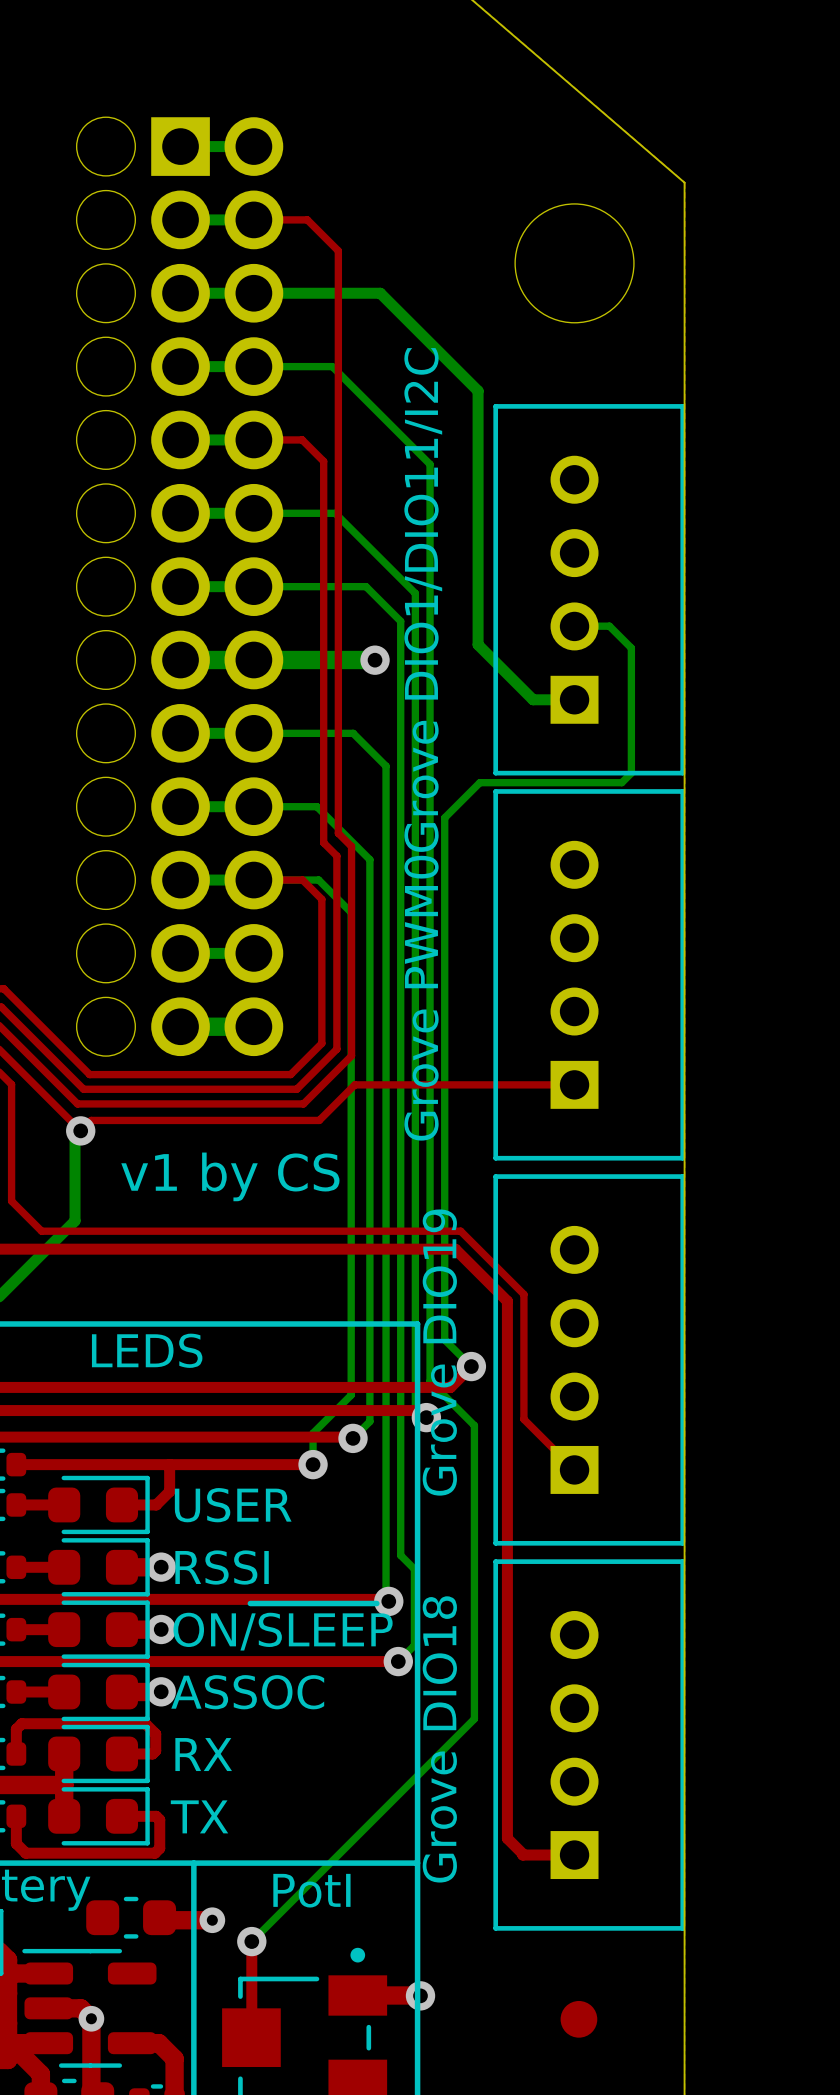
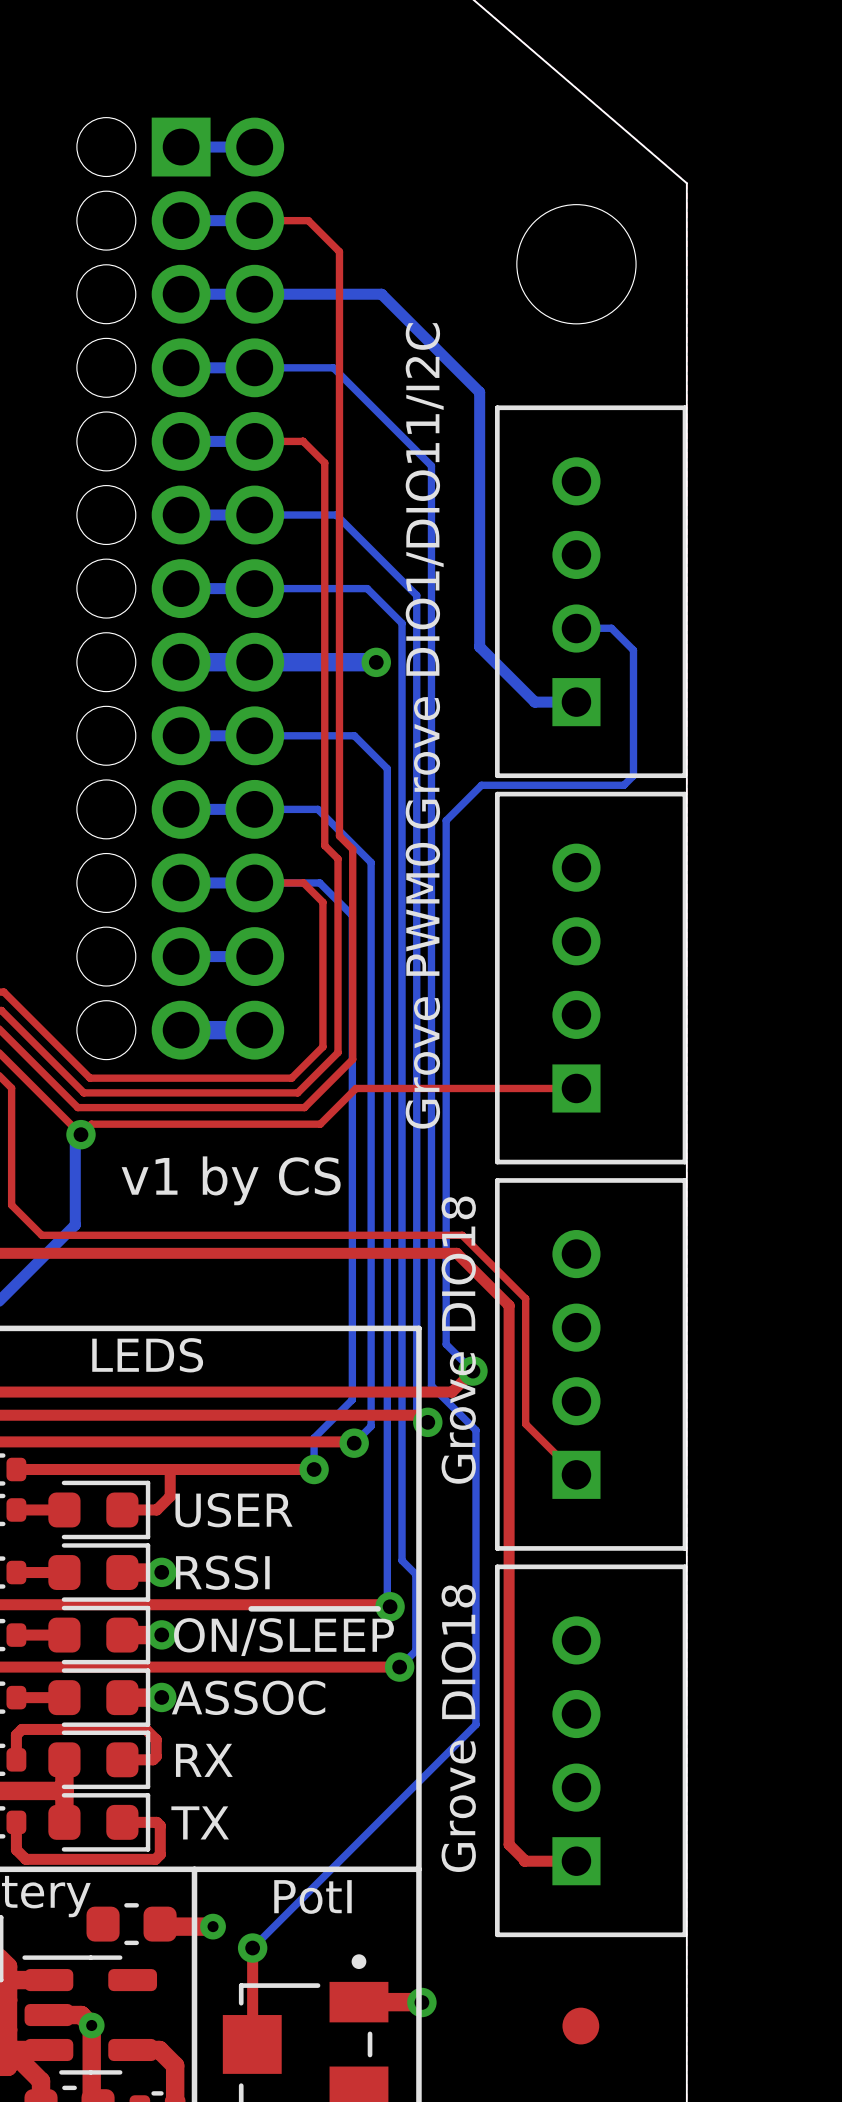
text: none -> Grove DIO1/DIO11/I2C (424, 575)
Grove DIO1/DIO11/I2C name: Grove DIO1/DIO11/I2C (423, 599) -> none
text: none -> Grove PWM0 (422, 985)
Grove PWM0 name: Grove PWM0 (421, 998) -> none
text: none -> Grove DIO18 (458, 1340)
Grove DIO19 name: Grove DIO19 (439, 1352) -> none
text: none -> Grove DIO18 (458, 1728)
Grove DIO18 name: Grove DIO18 (439, 1739) -> none

